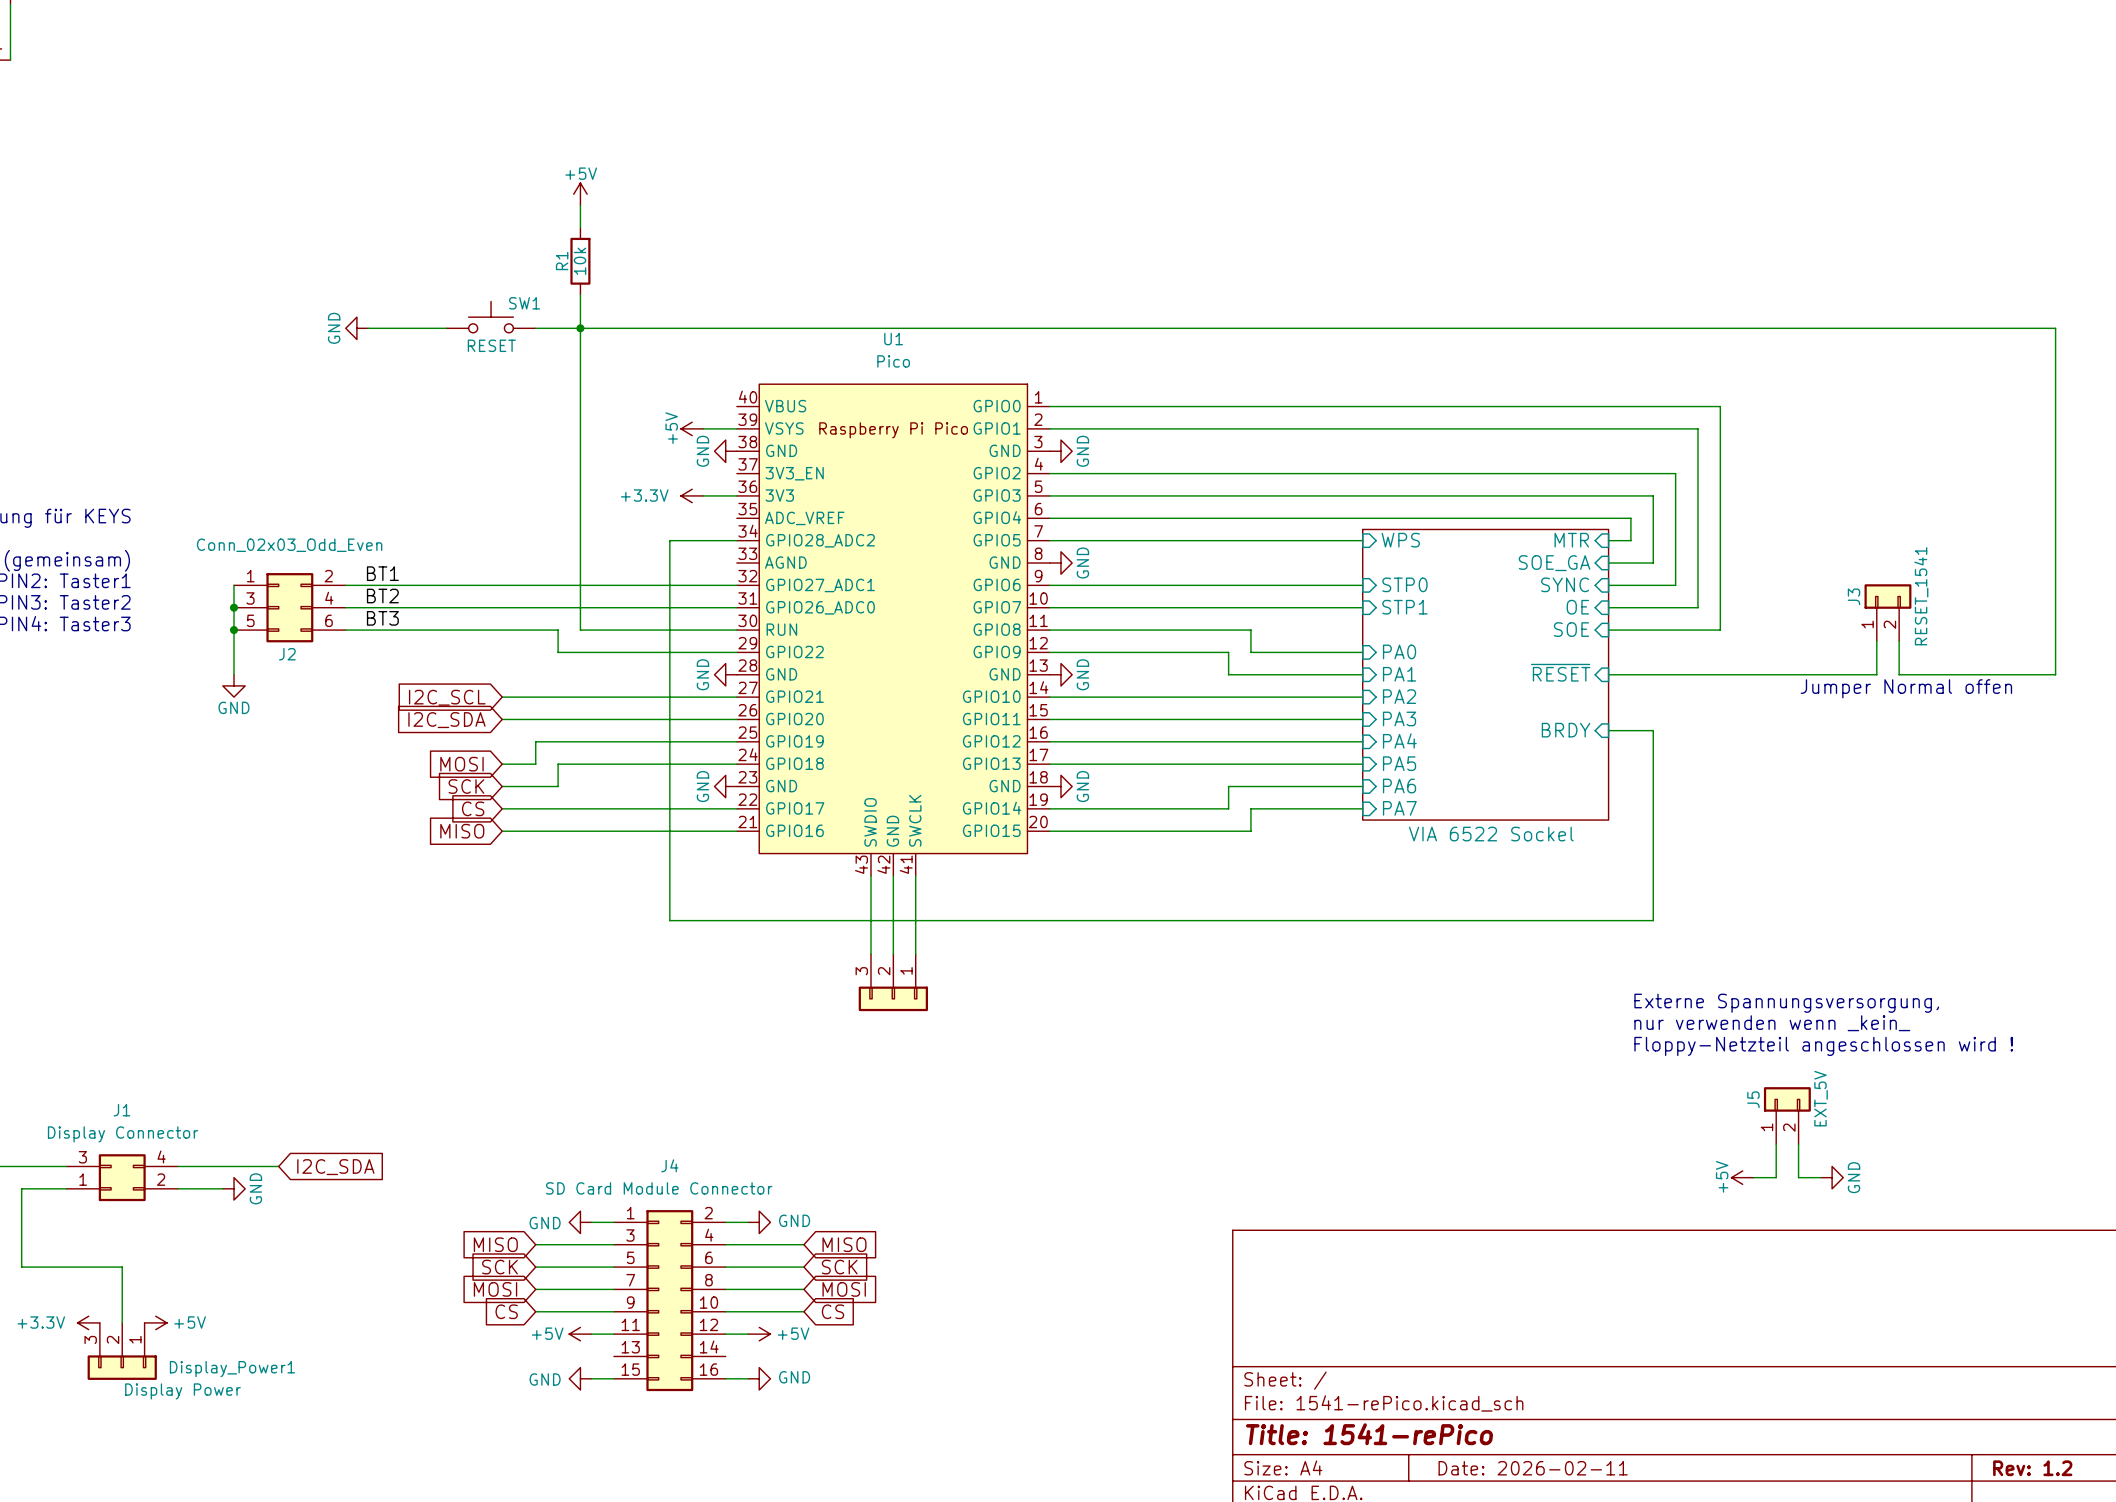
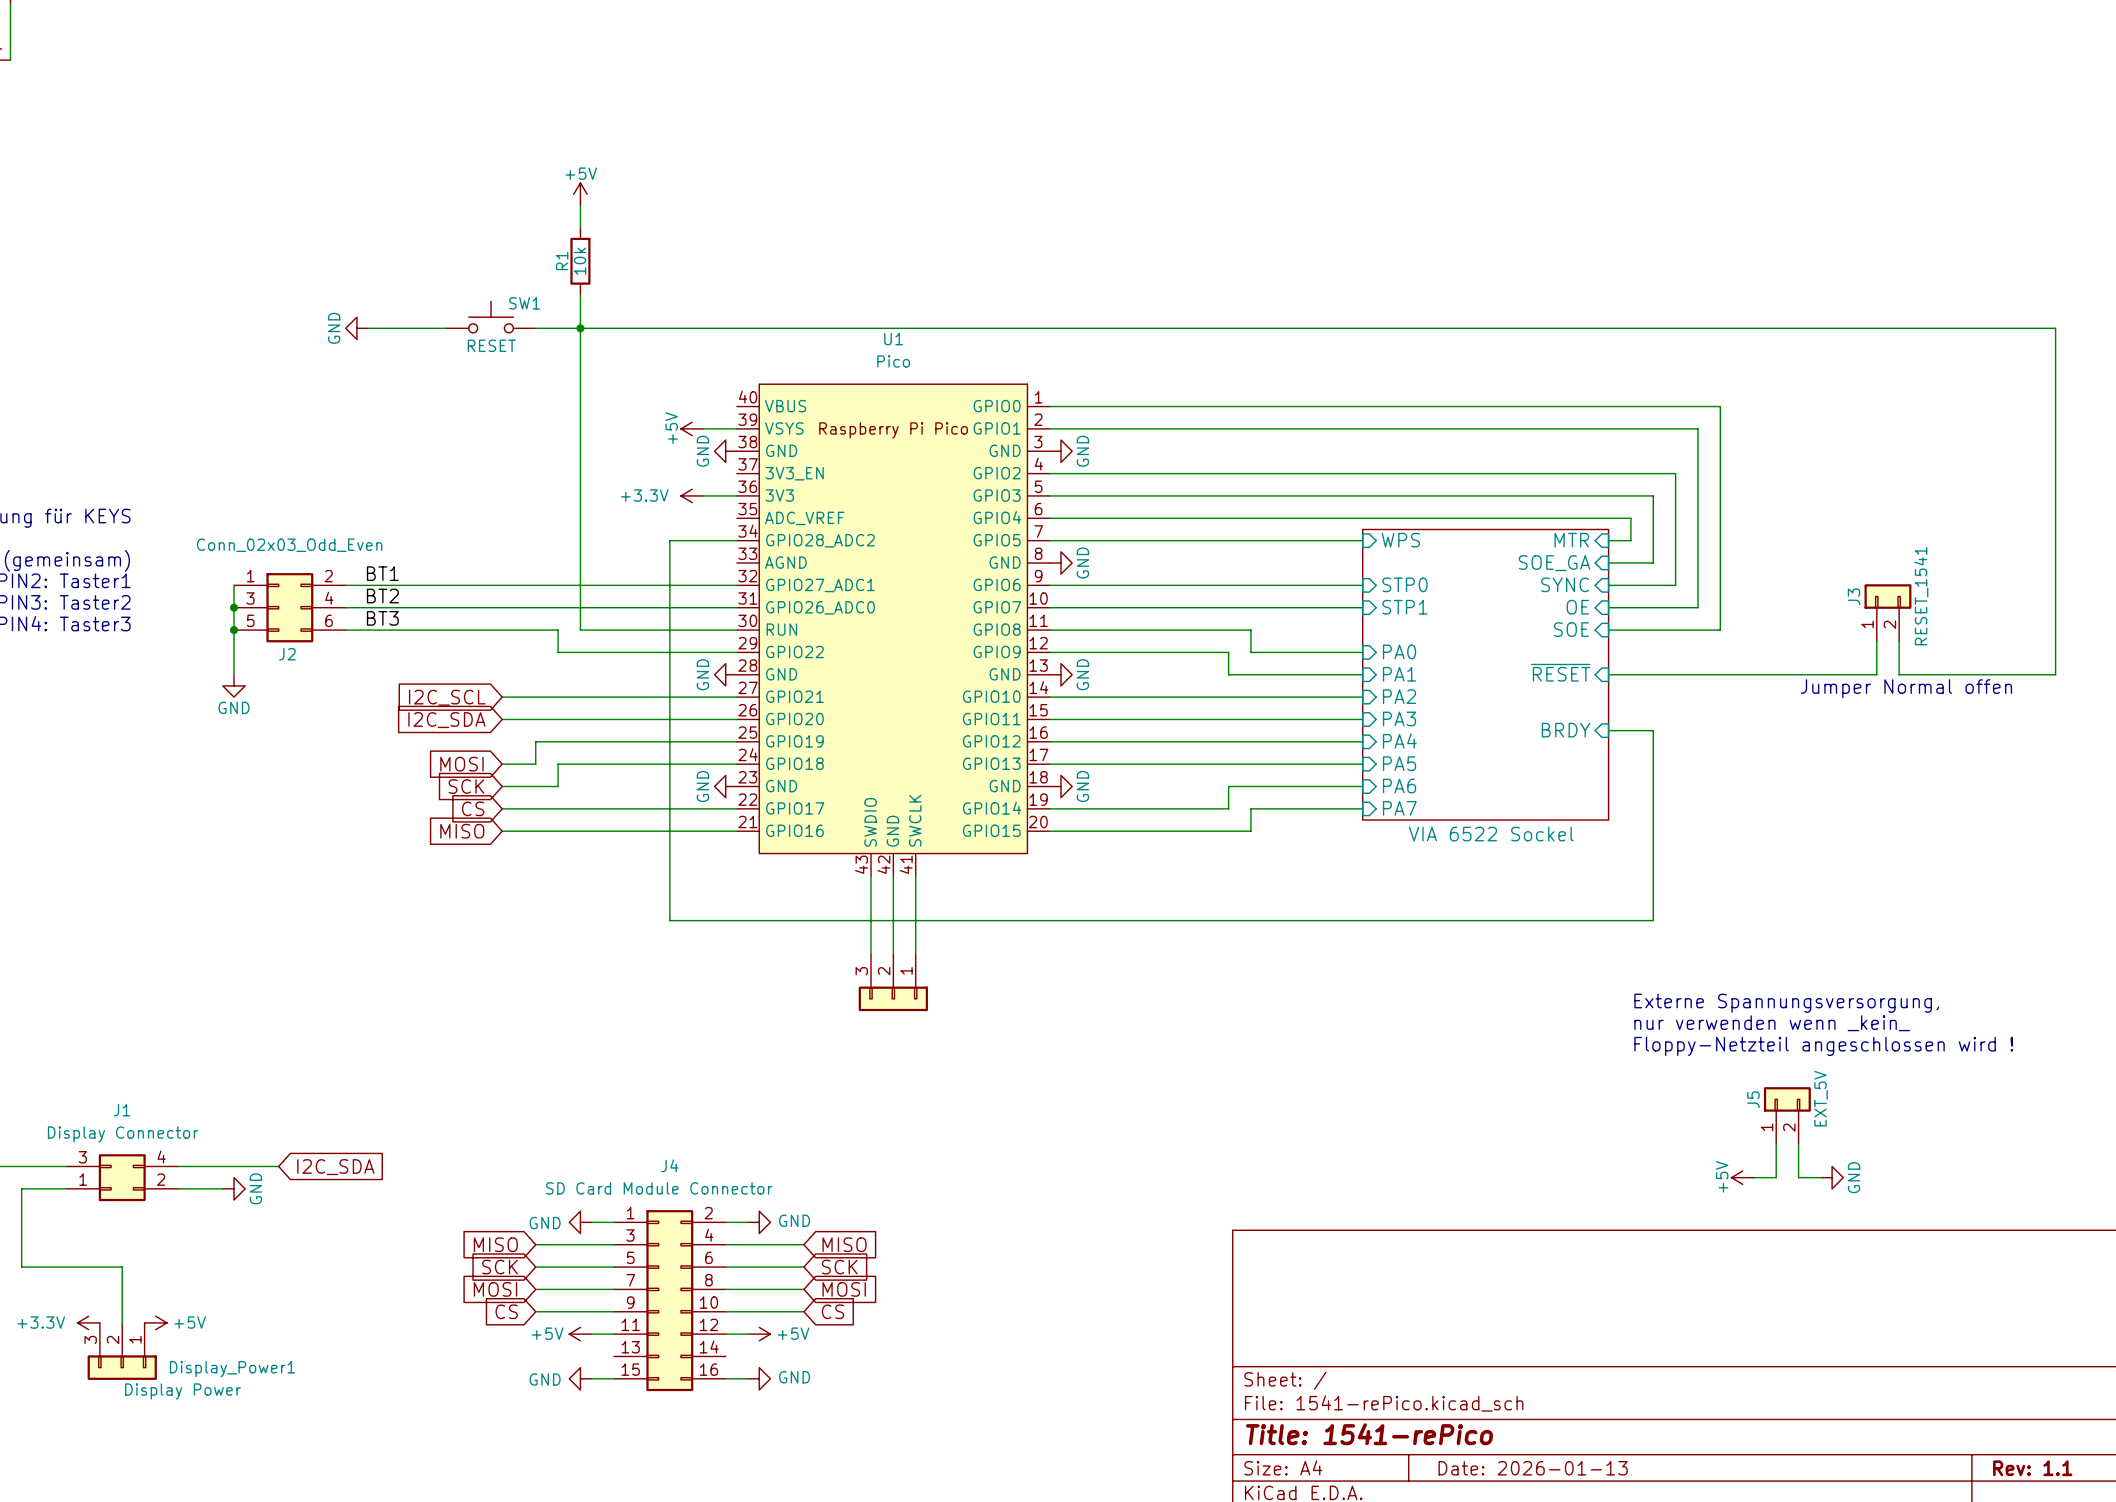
title block: Date: 2026-02-11 (1533, 1468) -> Date: 2026-01-13 (1533, 1468)
title block: Rev: 1.2 (2032, 1468) -> Rev: 1.1 (2032, 1468)

